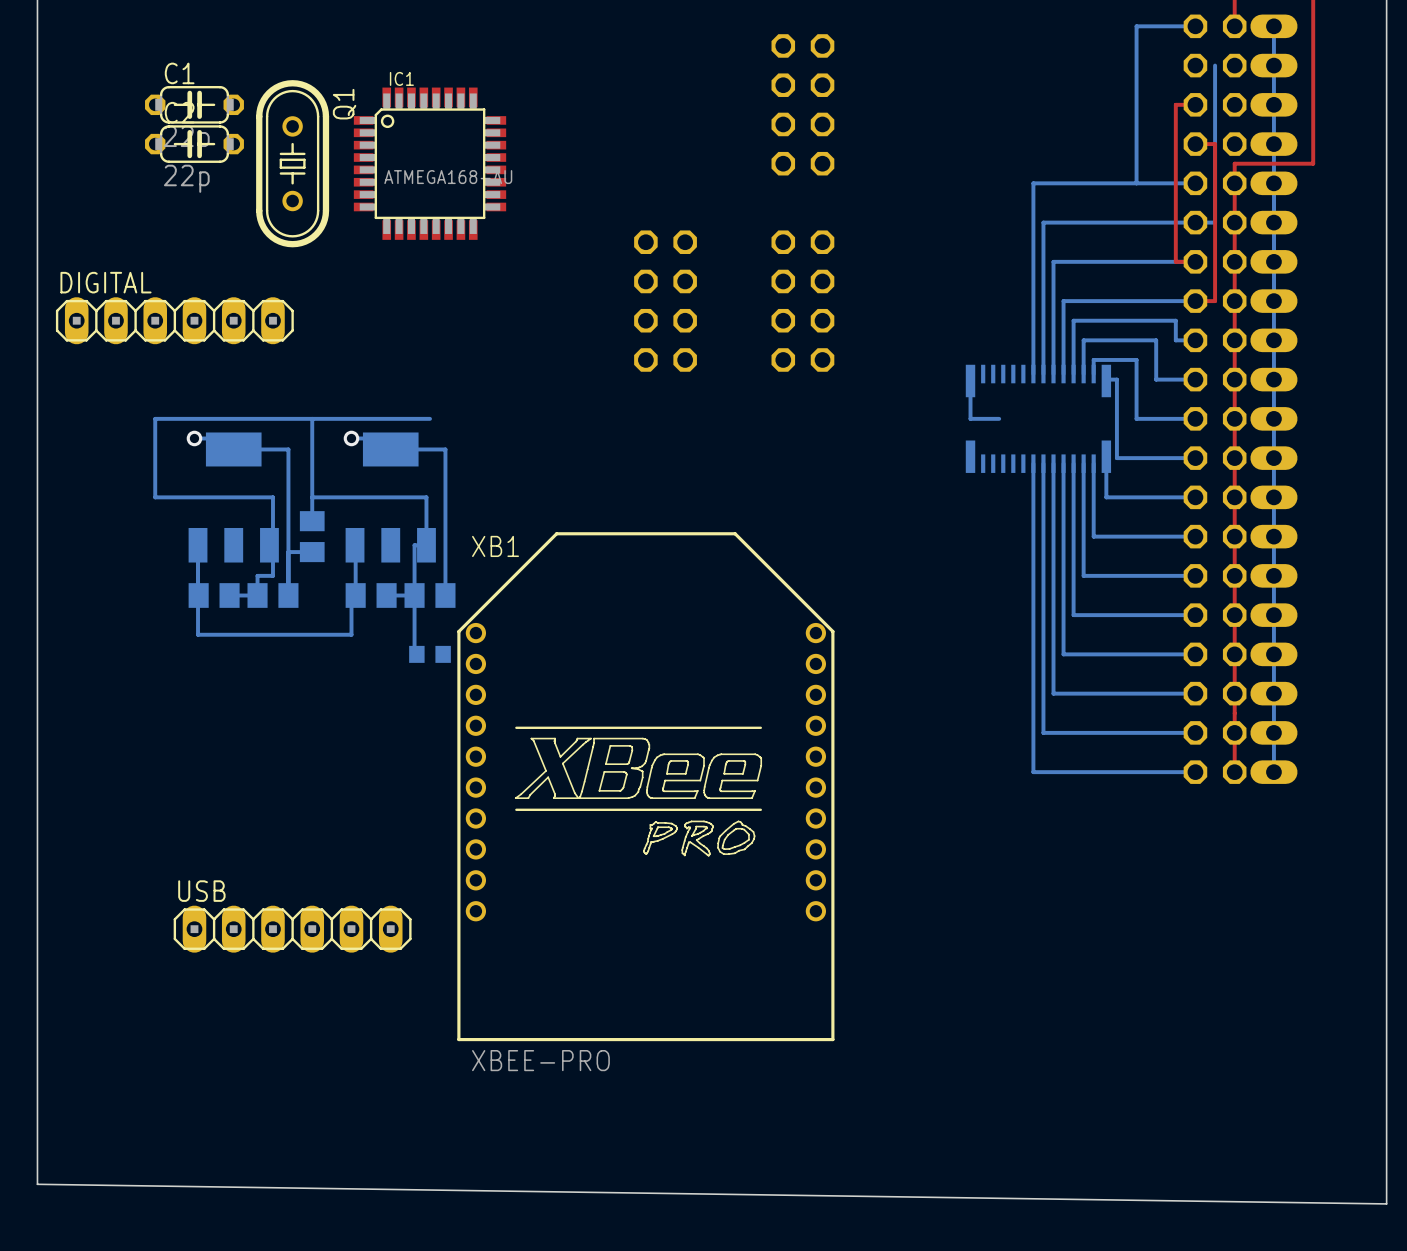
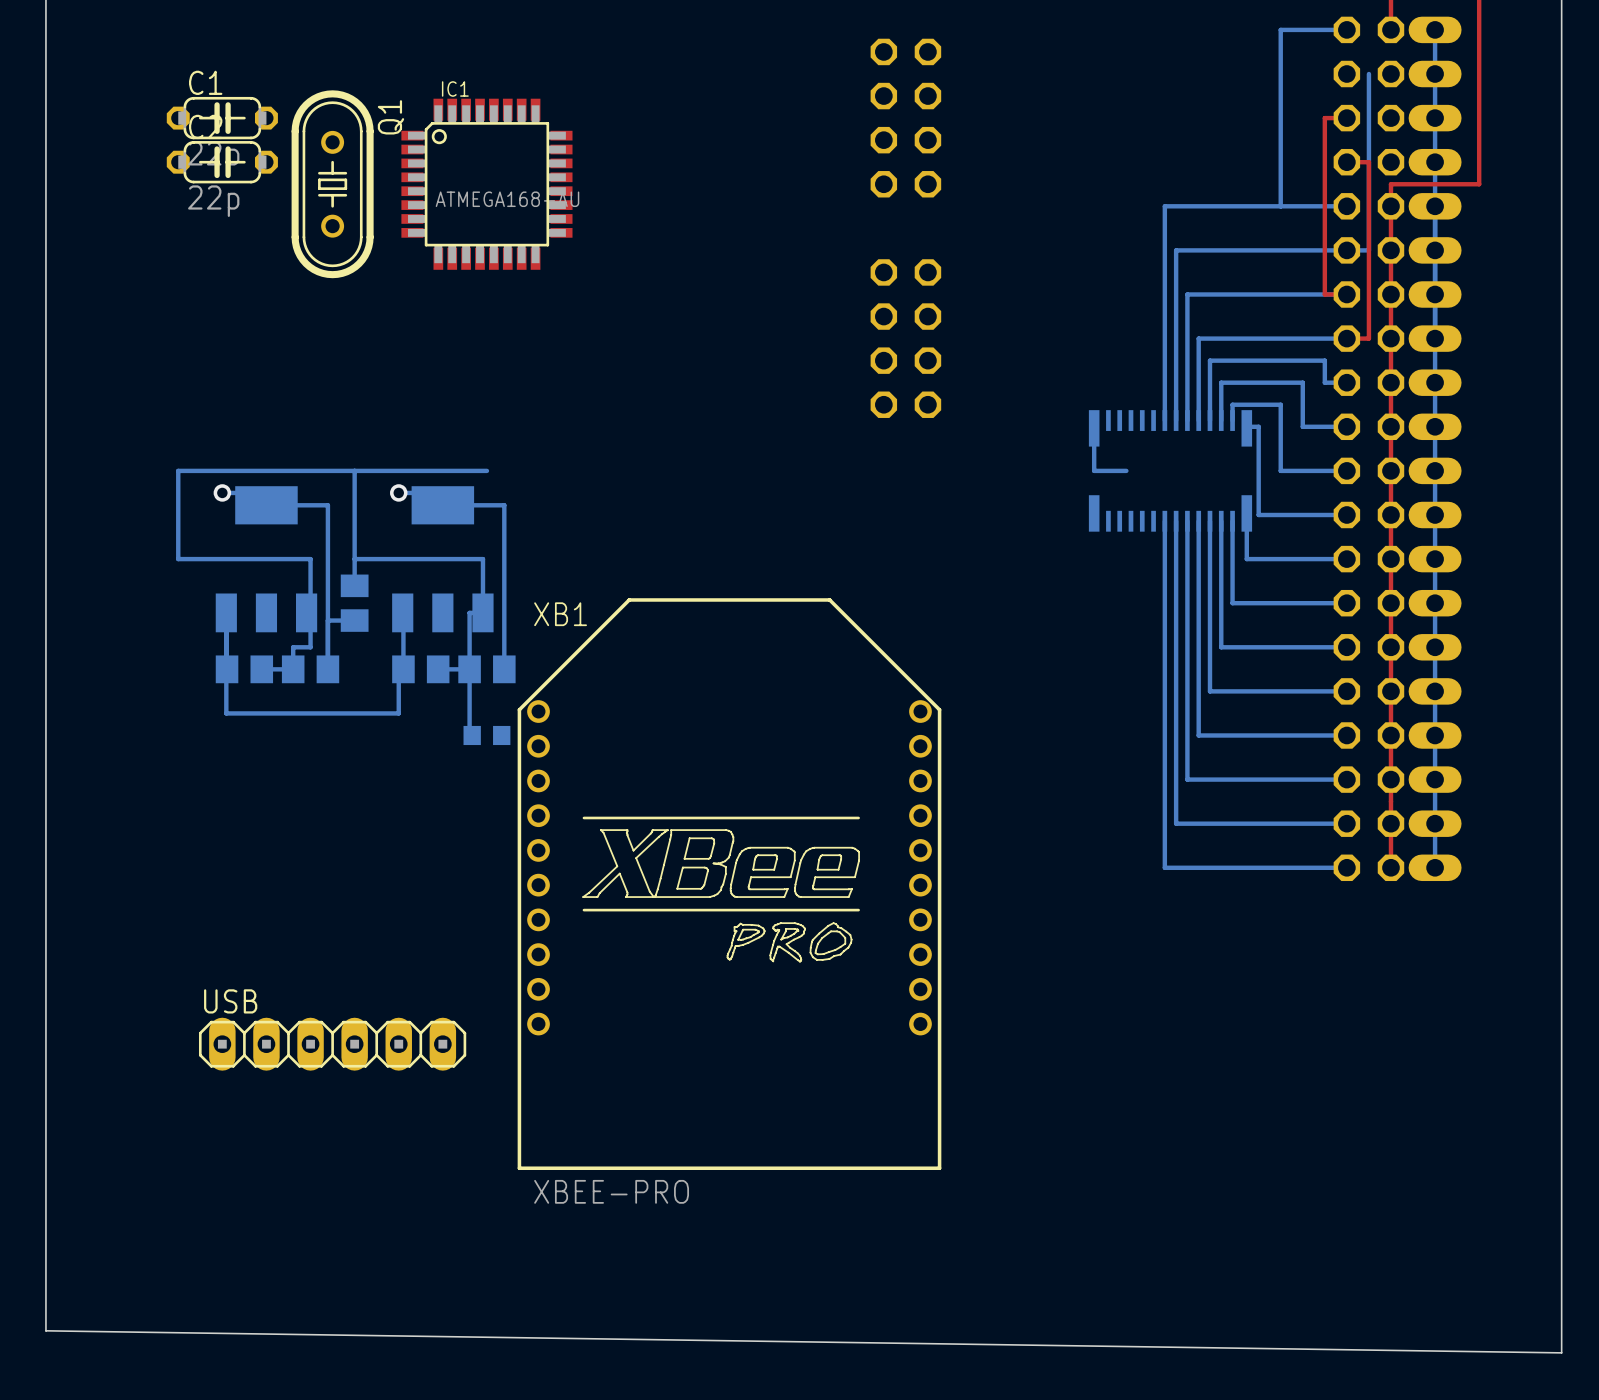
part: (665, 301) -> none
DIGITAL: (174, 320) -> none

